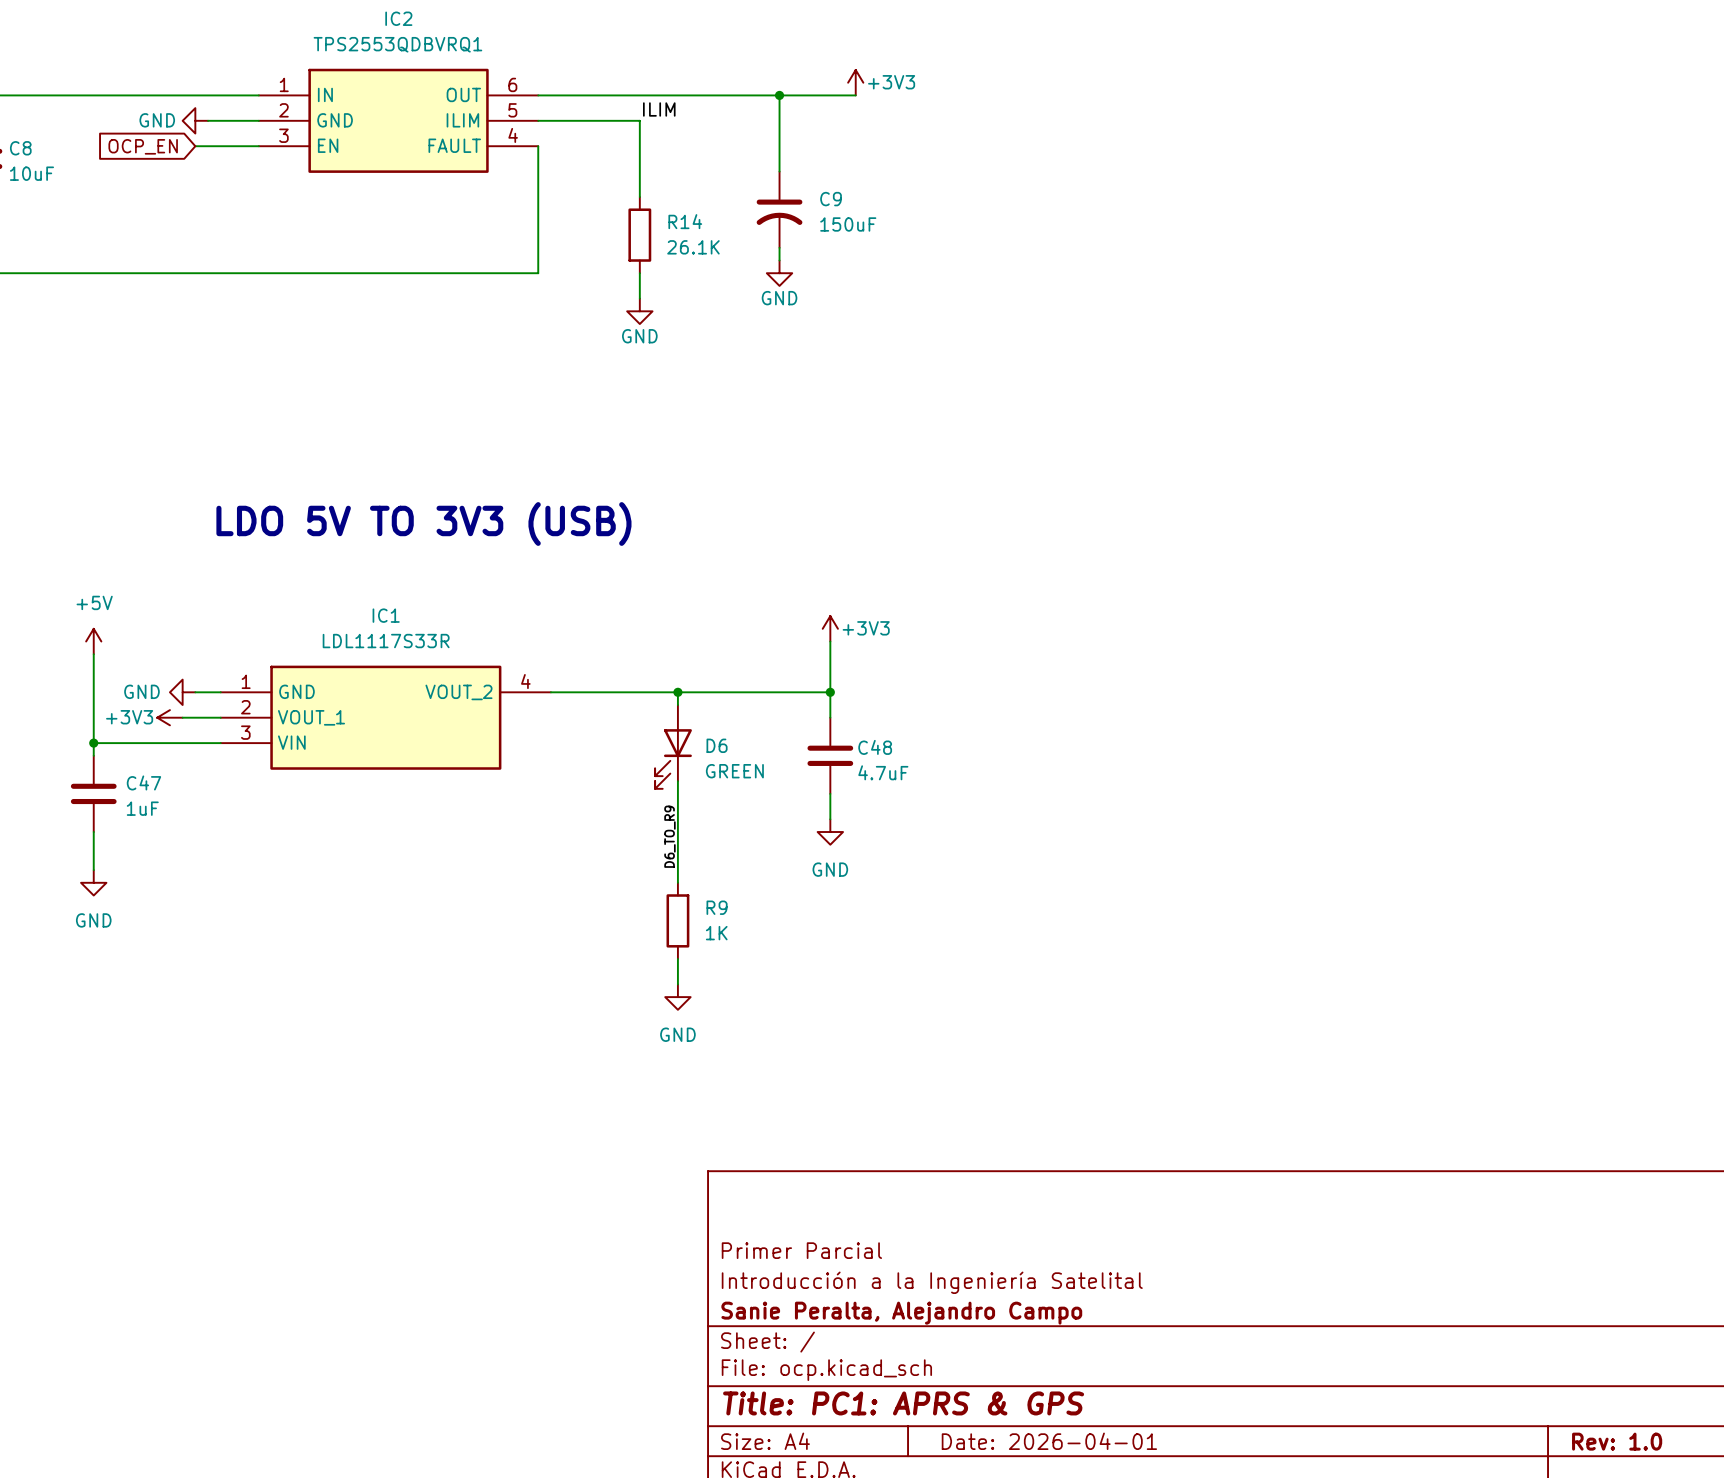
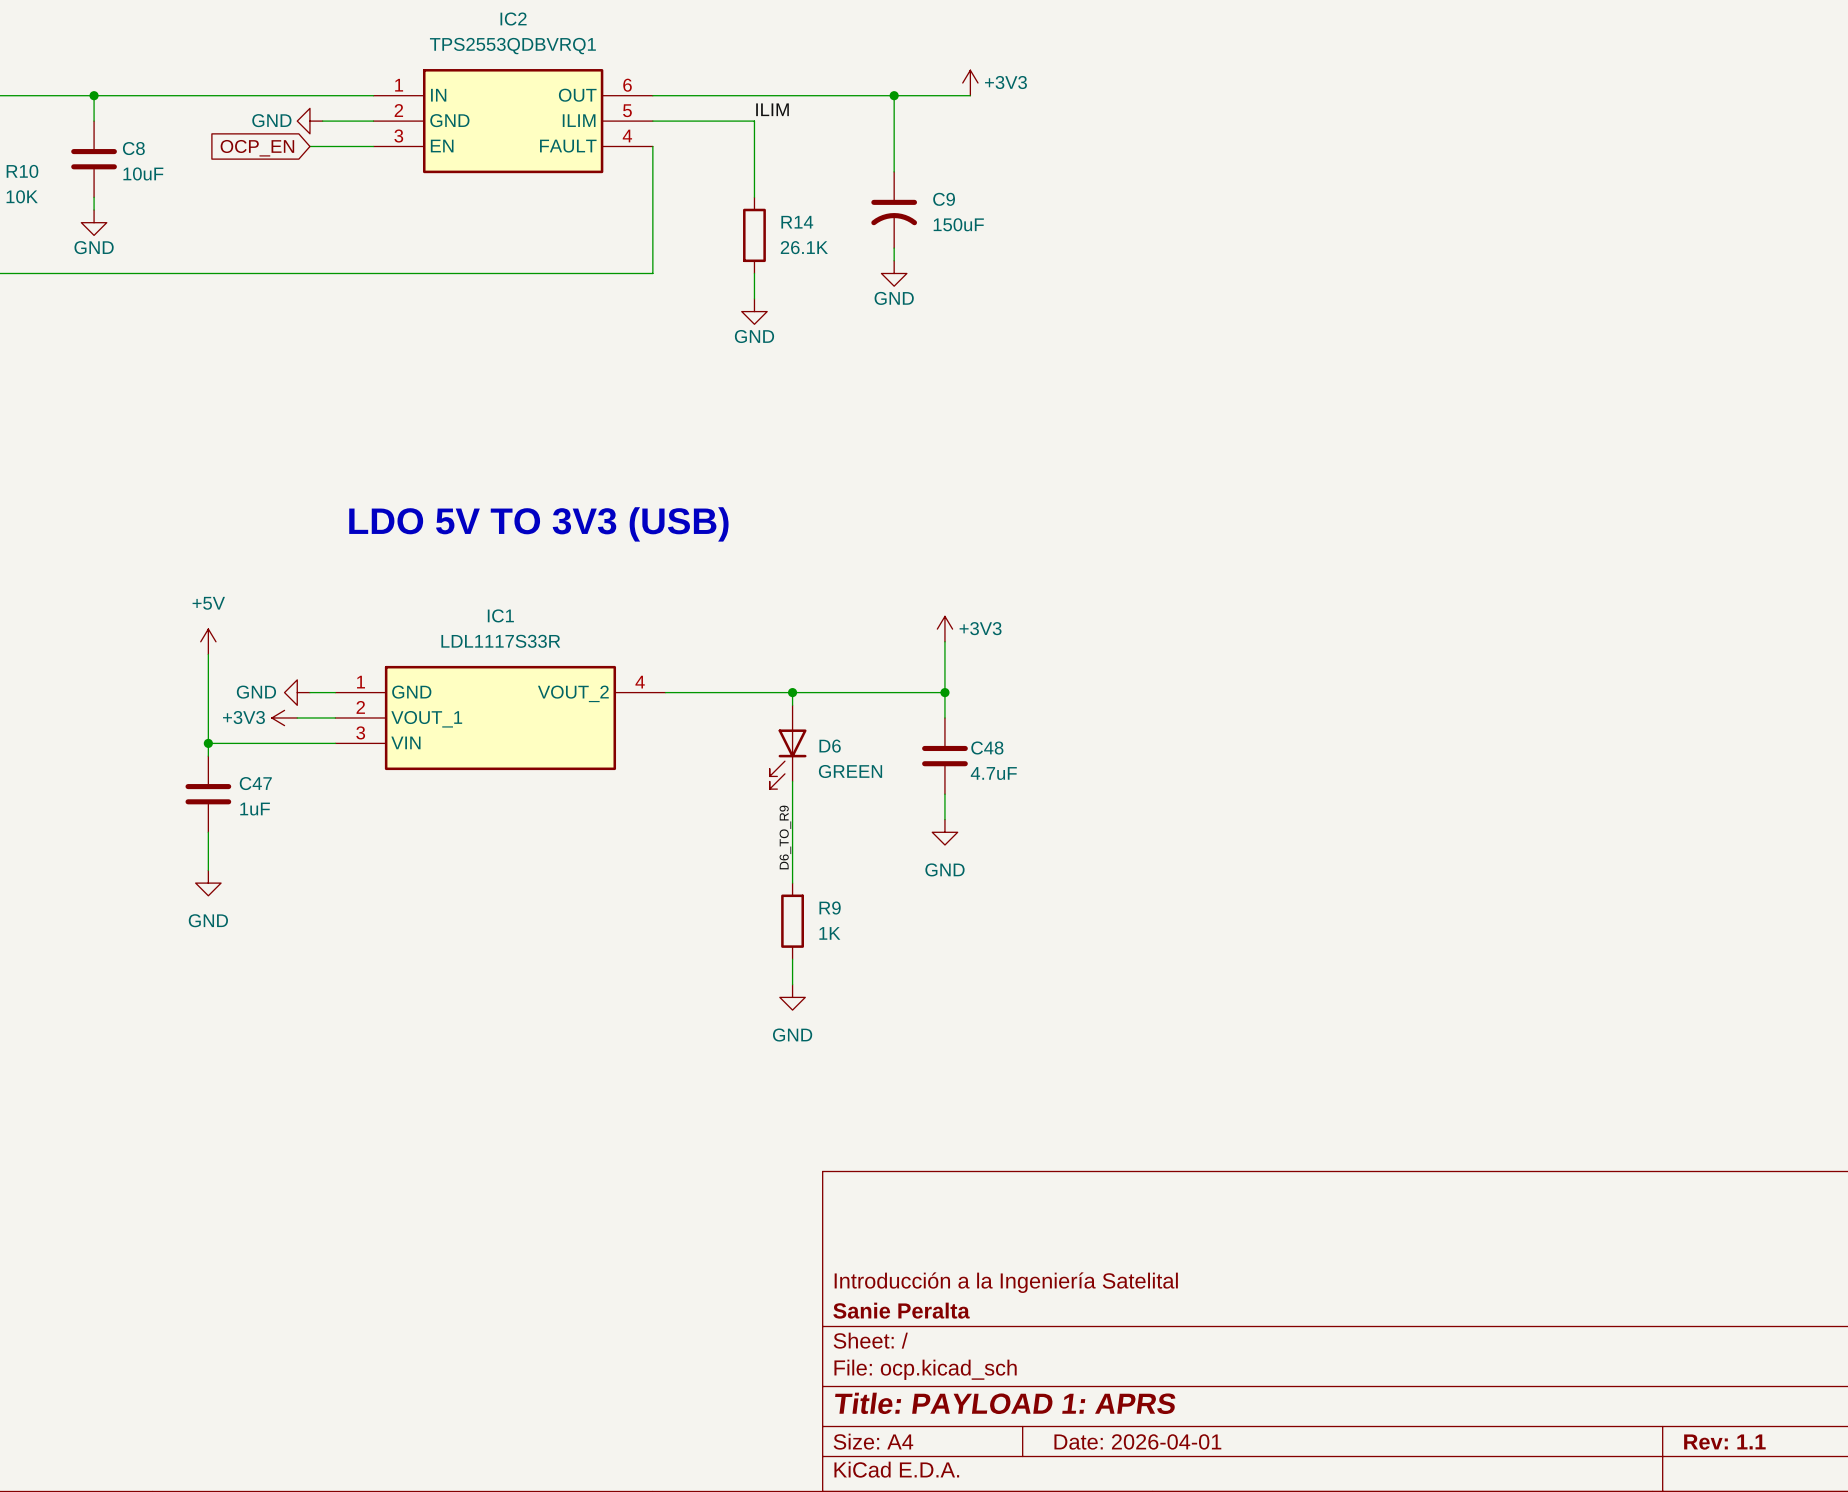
title block: Primer Parcial (801, 1250) -> none
title block: Sanie Peralta, Alejandro Campo (901, 1313) -> Sanie Peralta (901, 1310)
title block: Title: PC1: APRS & GPS (903, 1403) -> Title: PAYLOAD 1: APRS (1005, 1403)
title block: Rev: 1.0 (1617, 1441) -> Rev: 1.1 (1724, 1442)

